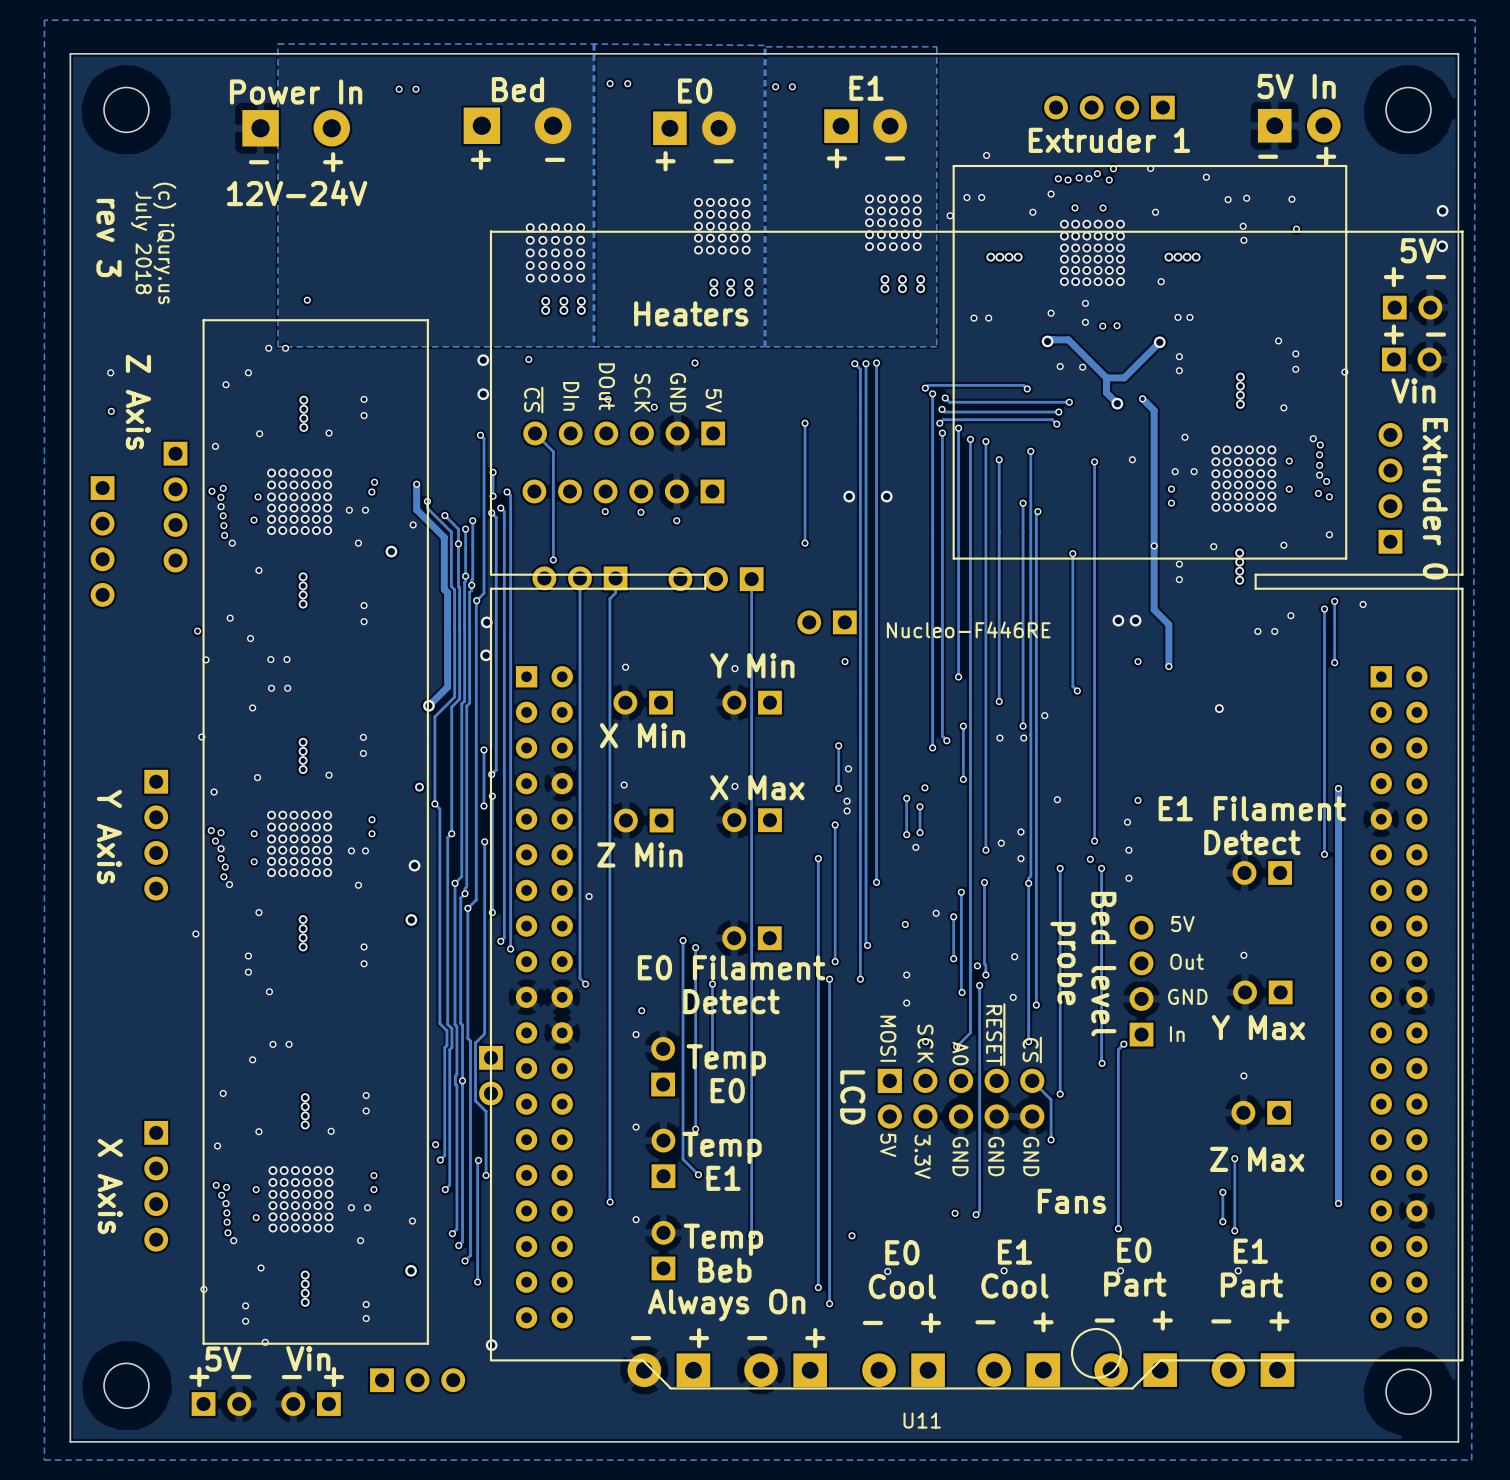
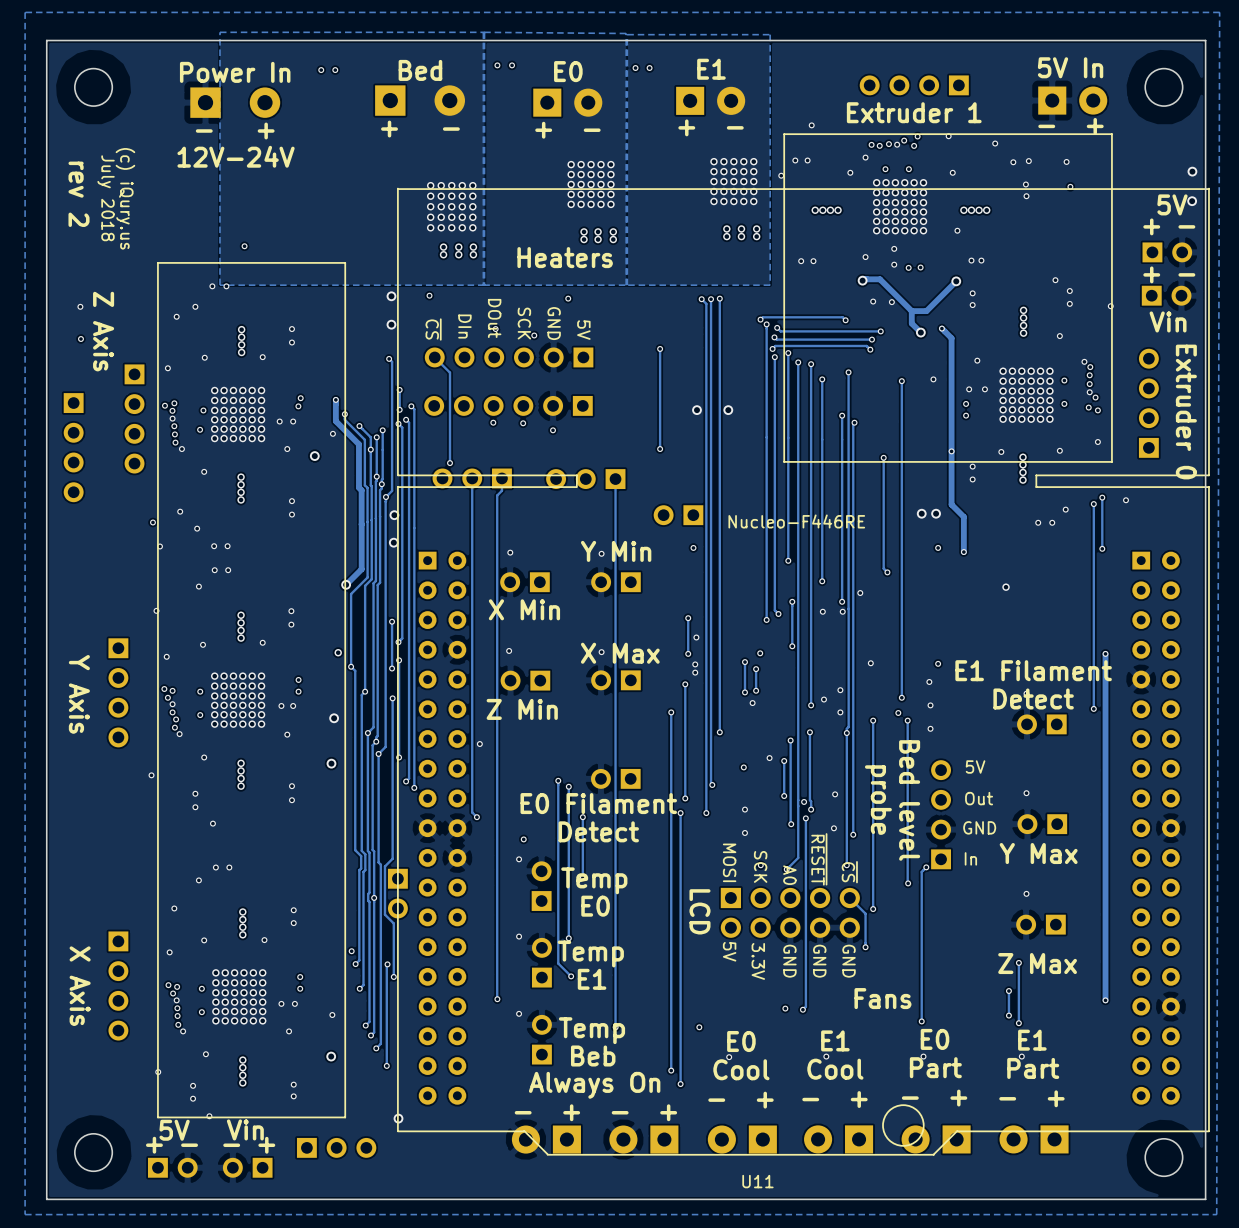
text: rev 3 (109, 238) -> rev 2 (79, 194)

